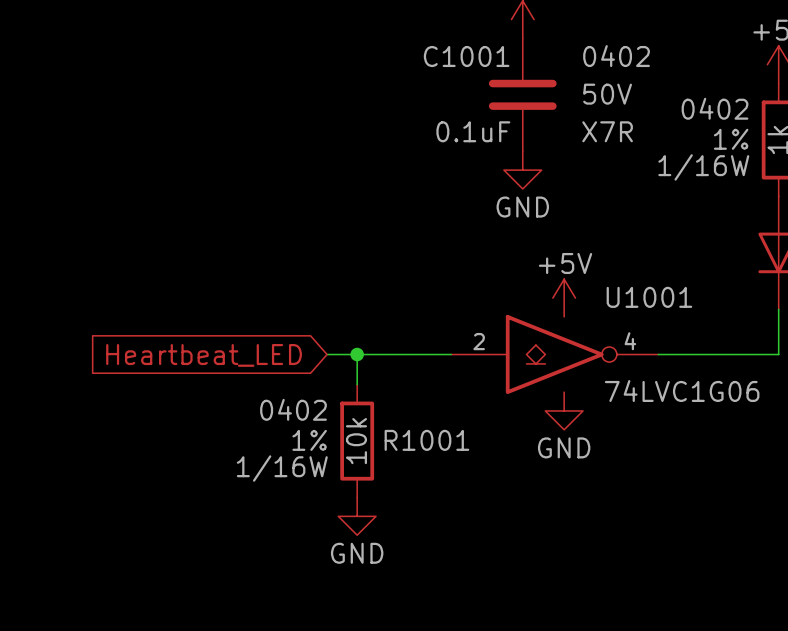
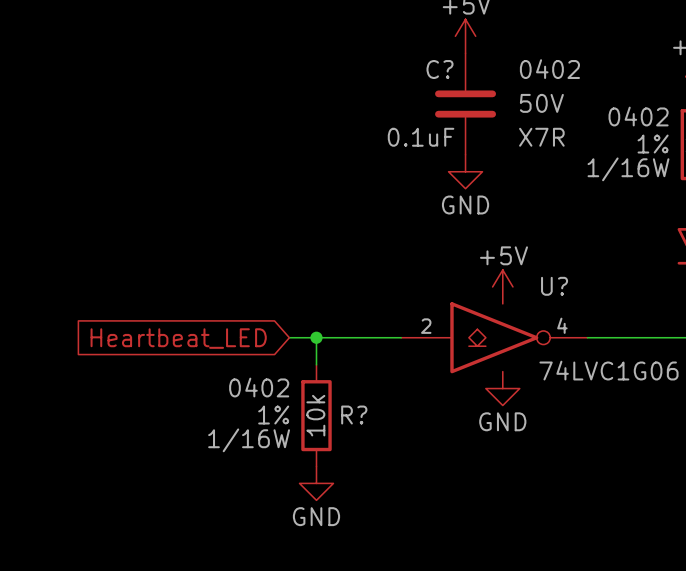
C1001 name: C1001 (466, 56) -> C? (440, 69)
U1001 name: U1001 (649, 297) -> U? (554, 286)
R1001 name: R1001 (426, 440) -> R? (354, 415)

